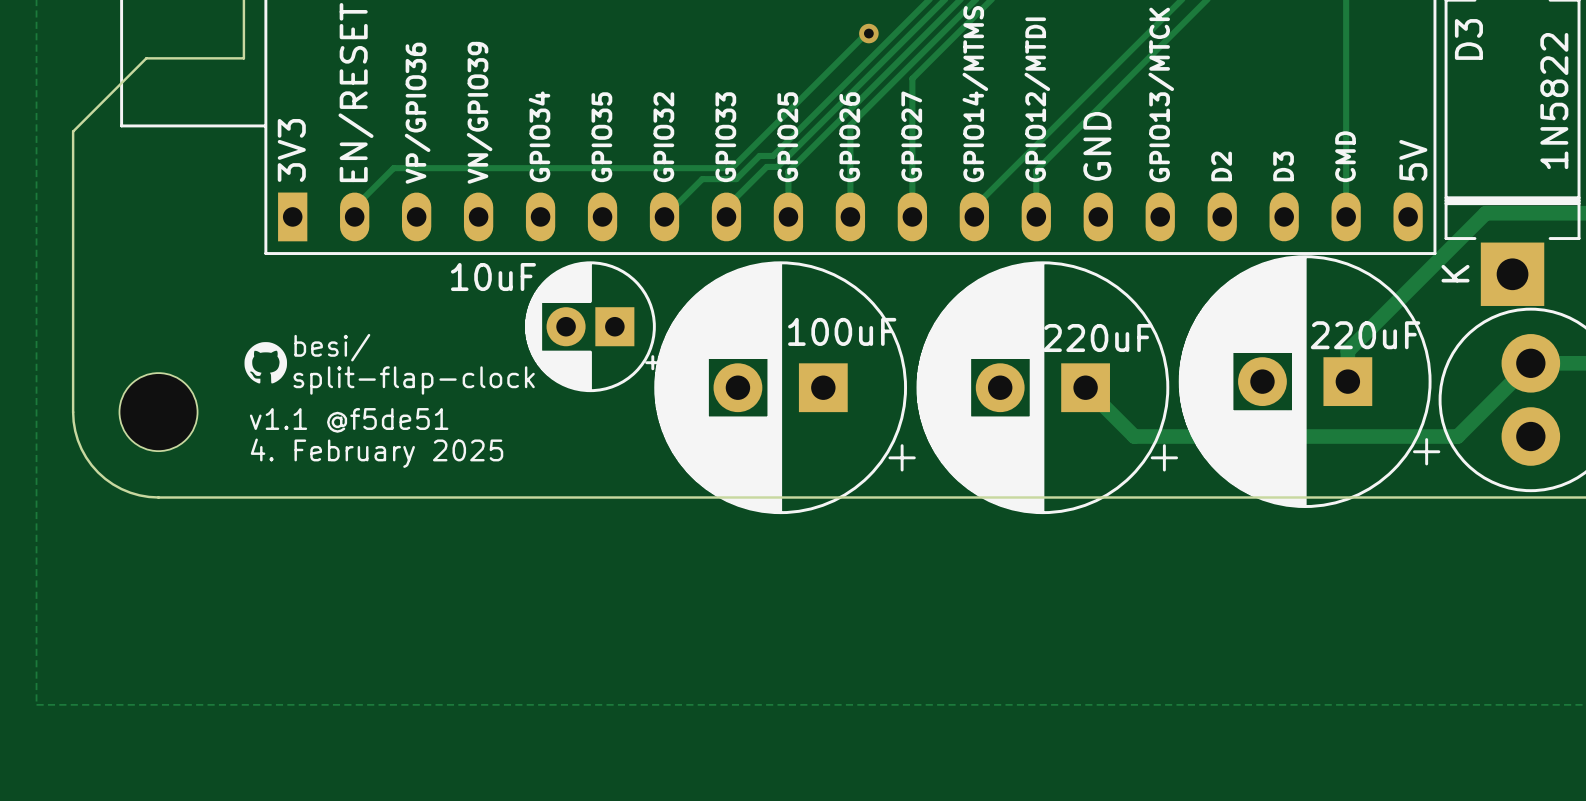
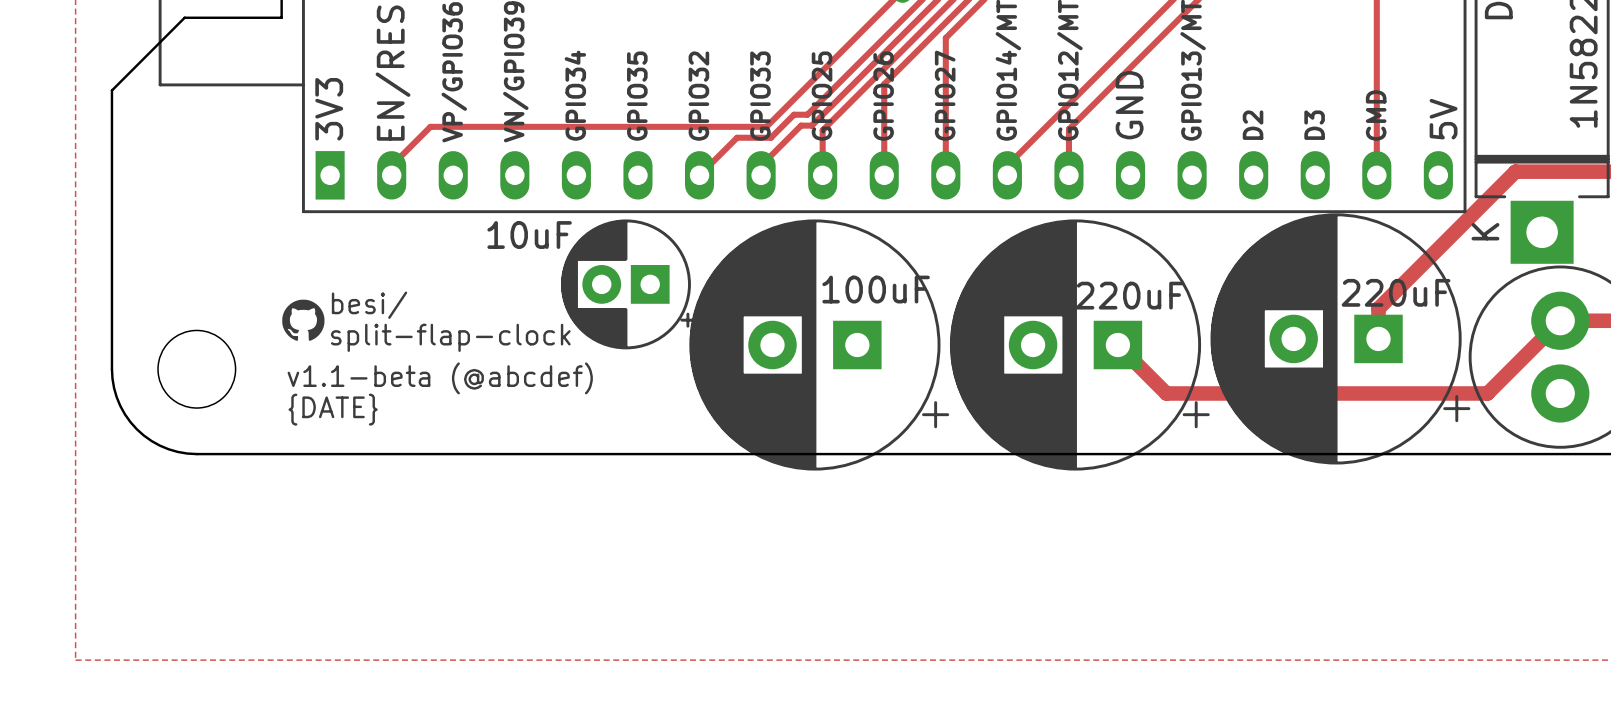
text: v1.1 @f5de51 (349, 420) -> v1.1-beta (@abcdef) (440, 378)
text: 4. February 2025 (377, 453) -> {DATE} (333, 409)

